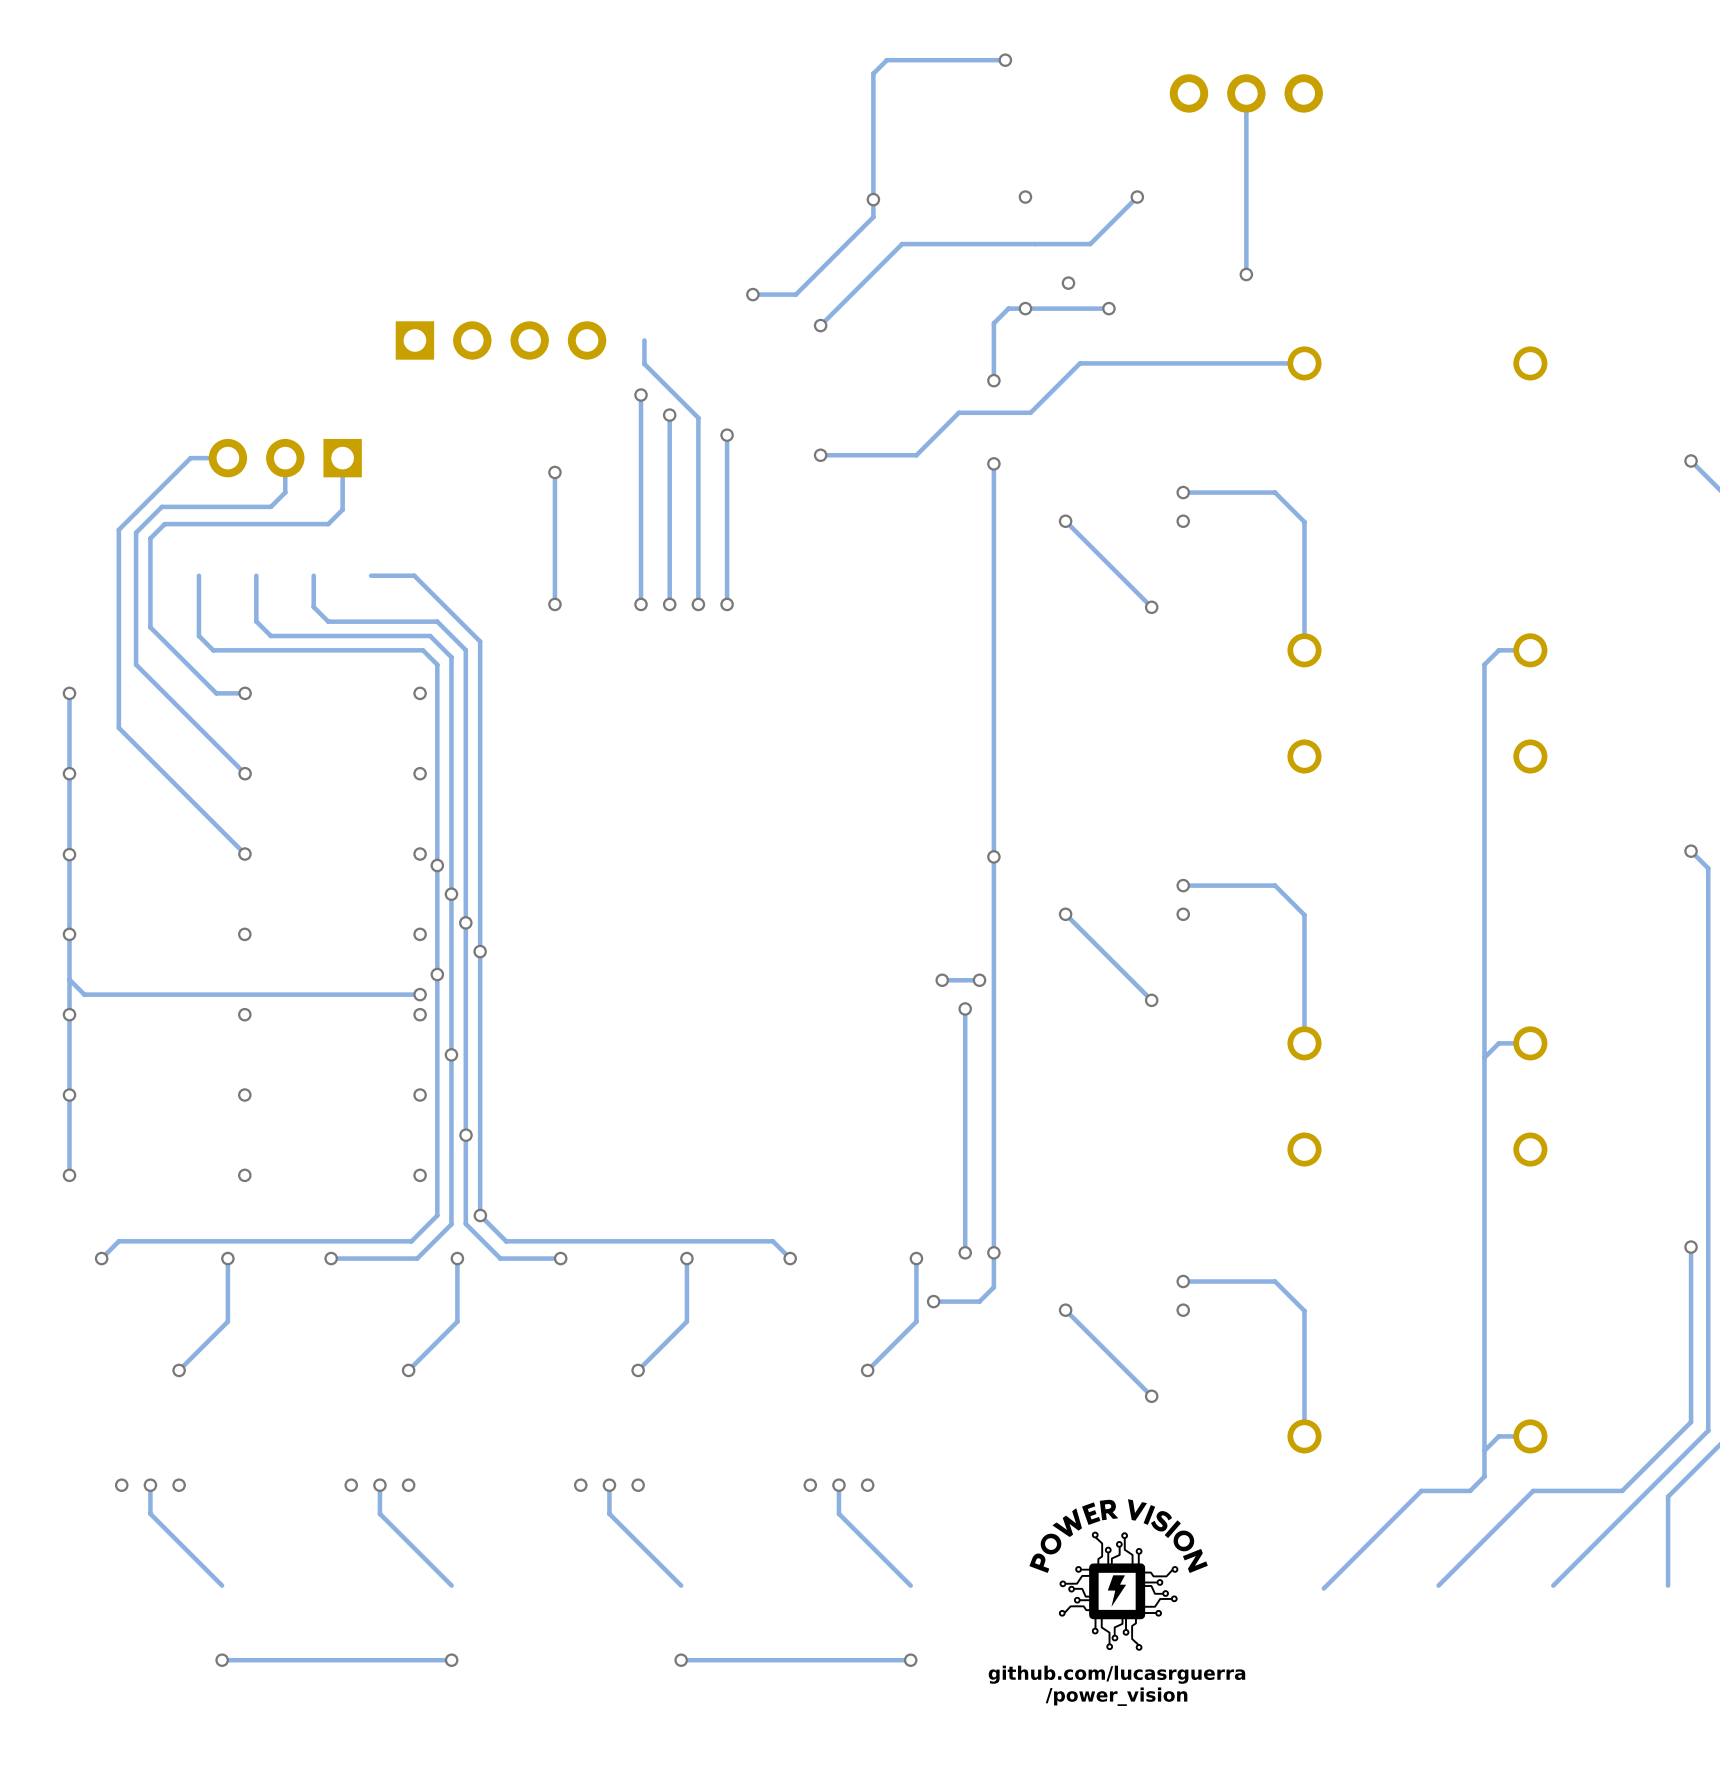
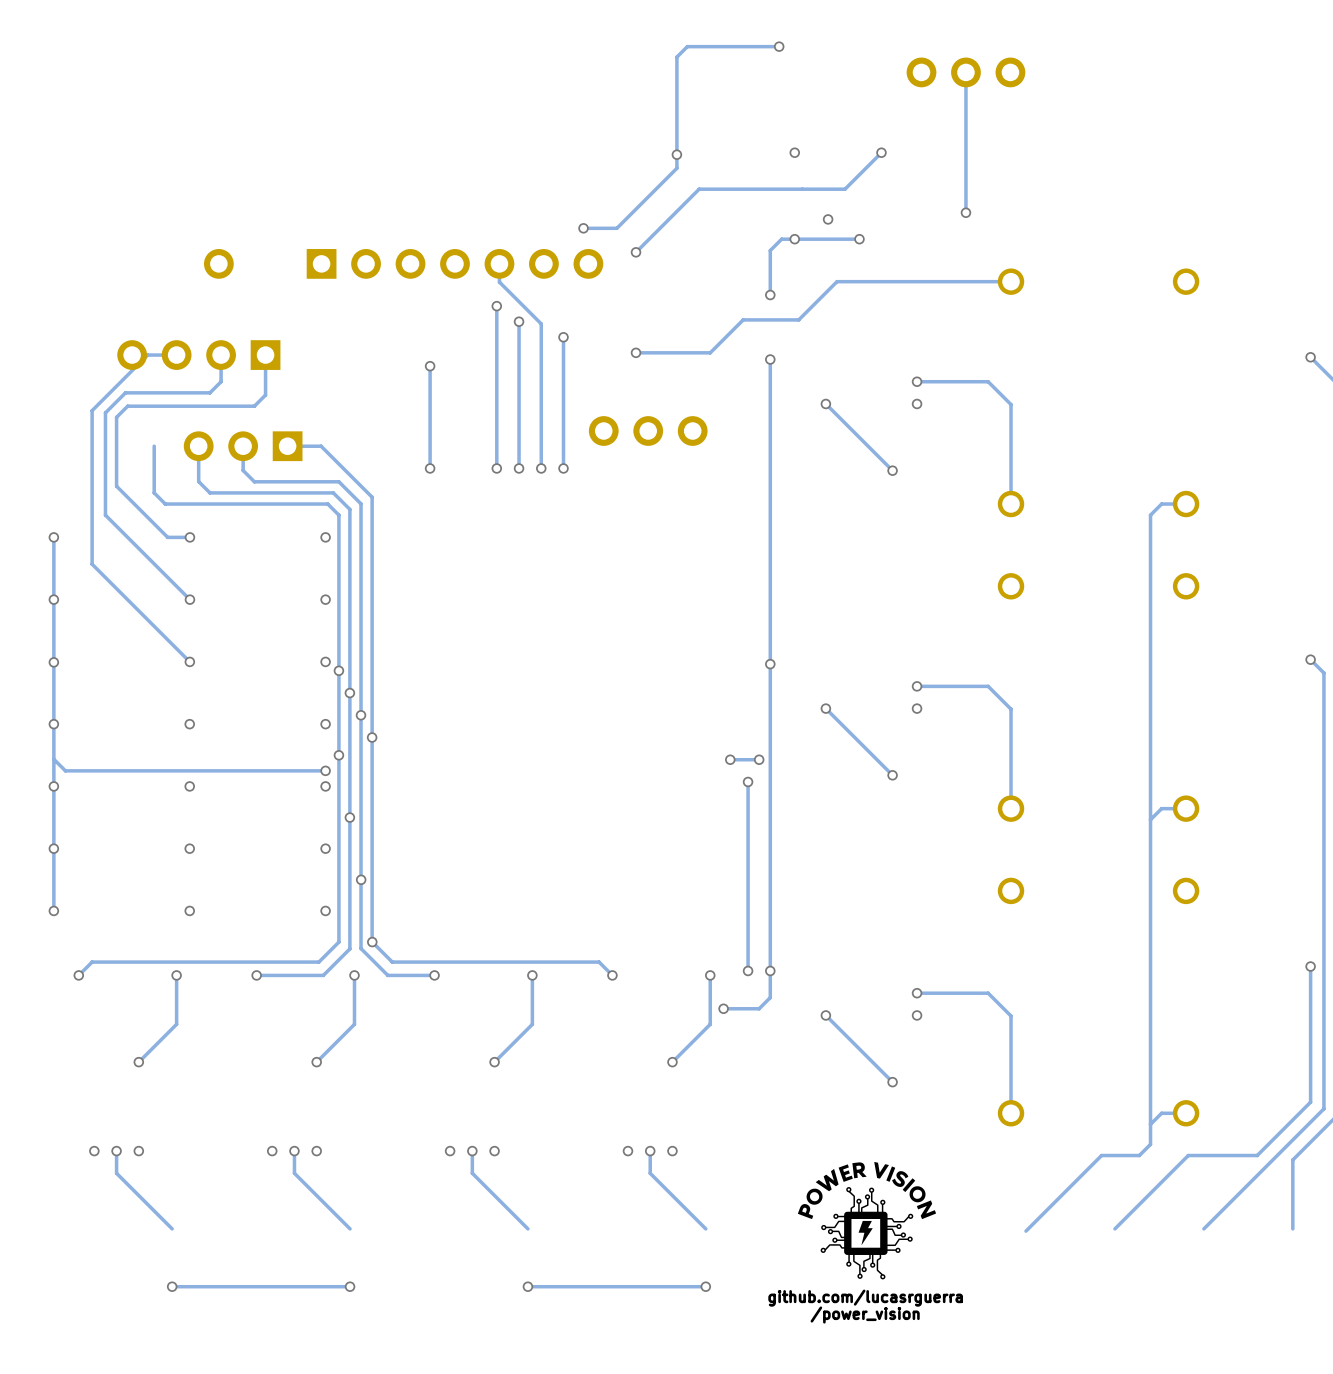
part: none -> (218, 263)
part rotation: 0° (500, 340) -> 180° (198, 355)
part position: (500, 340) -> (198, 355)
part: none -> (454, 263)
part position: (285, 458) -> (243, 446)
part: none -> (648, 431)

